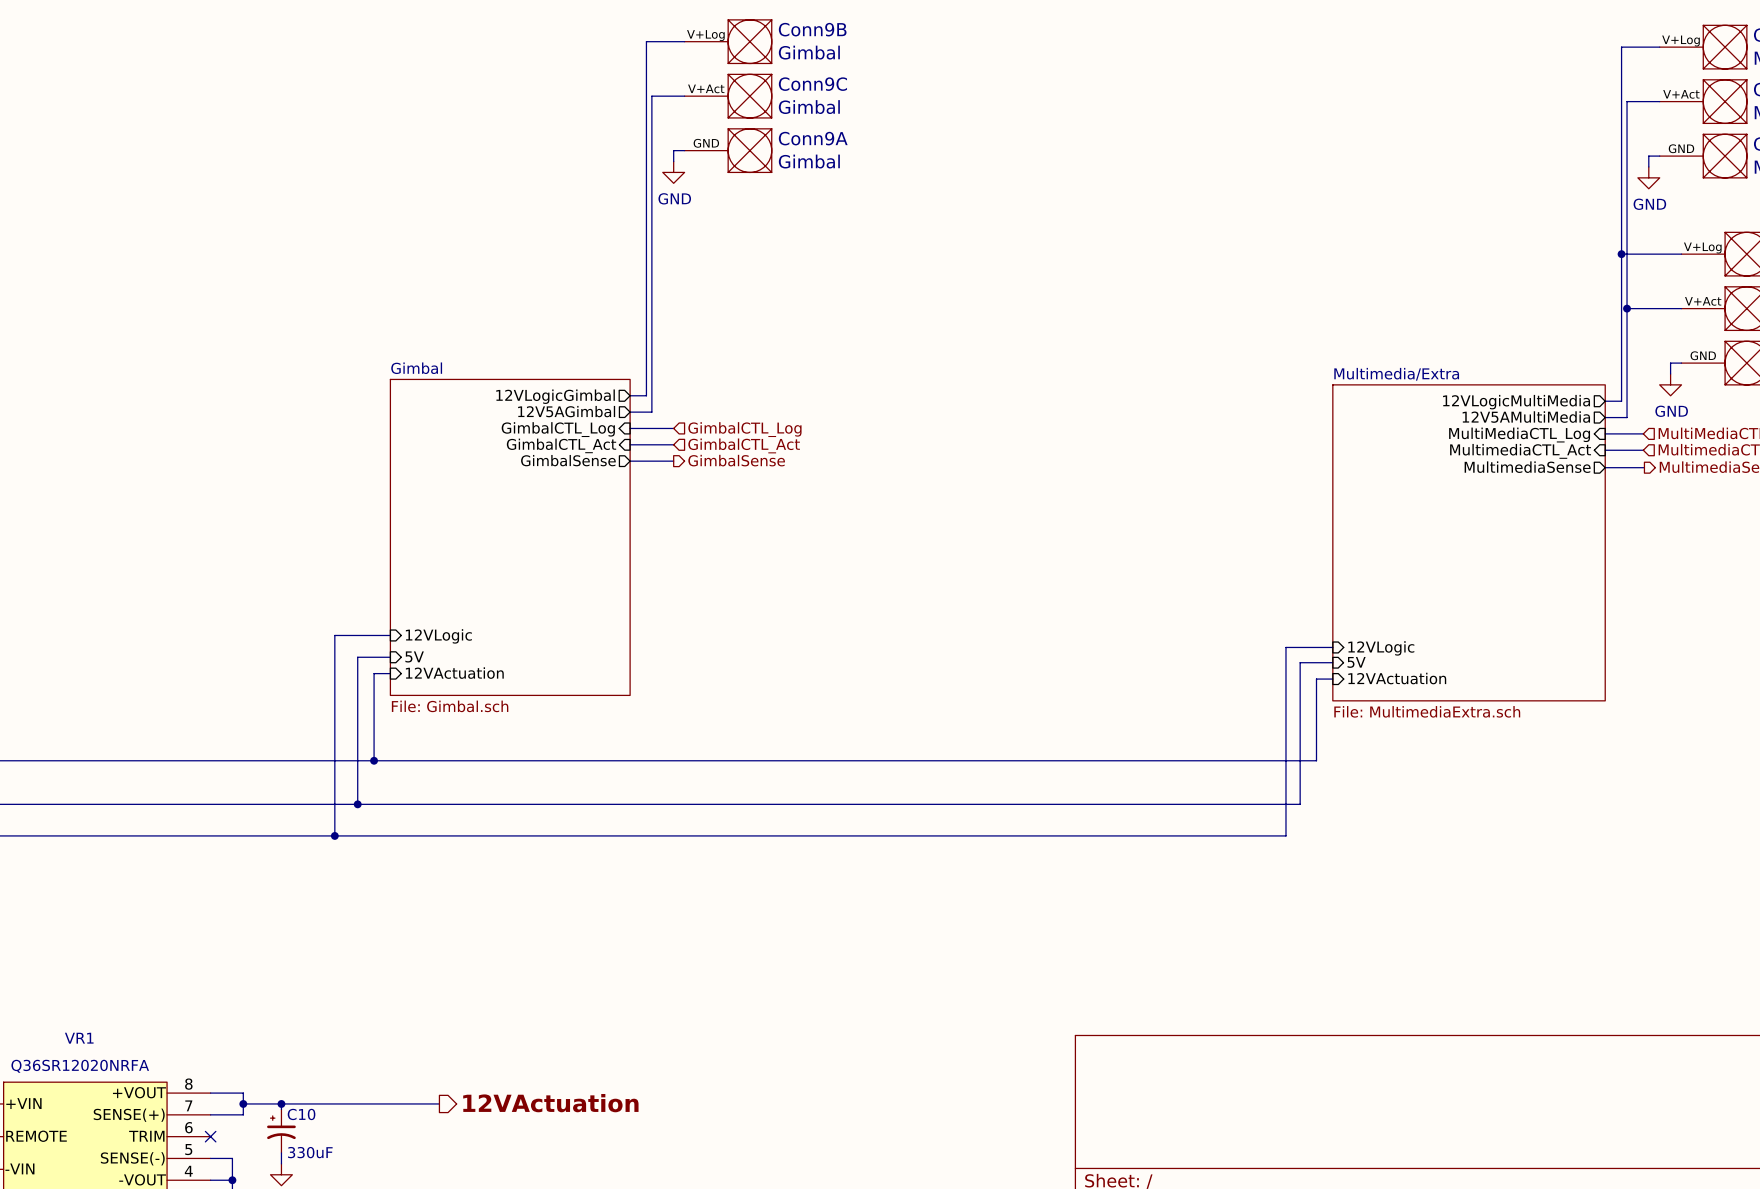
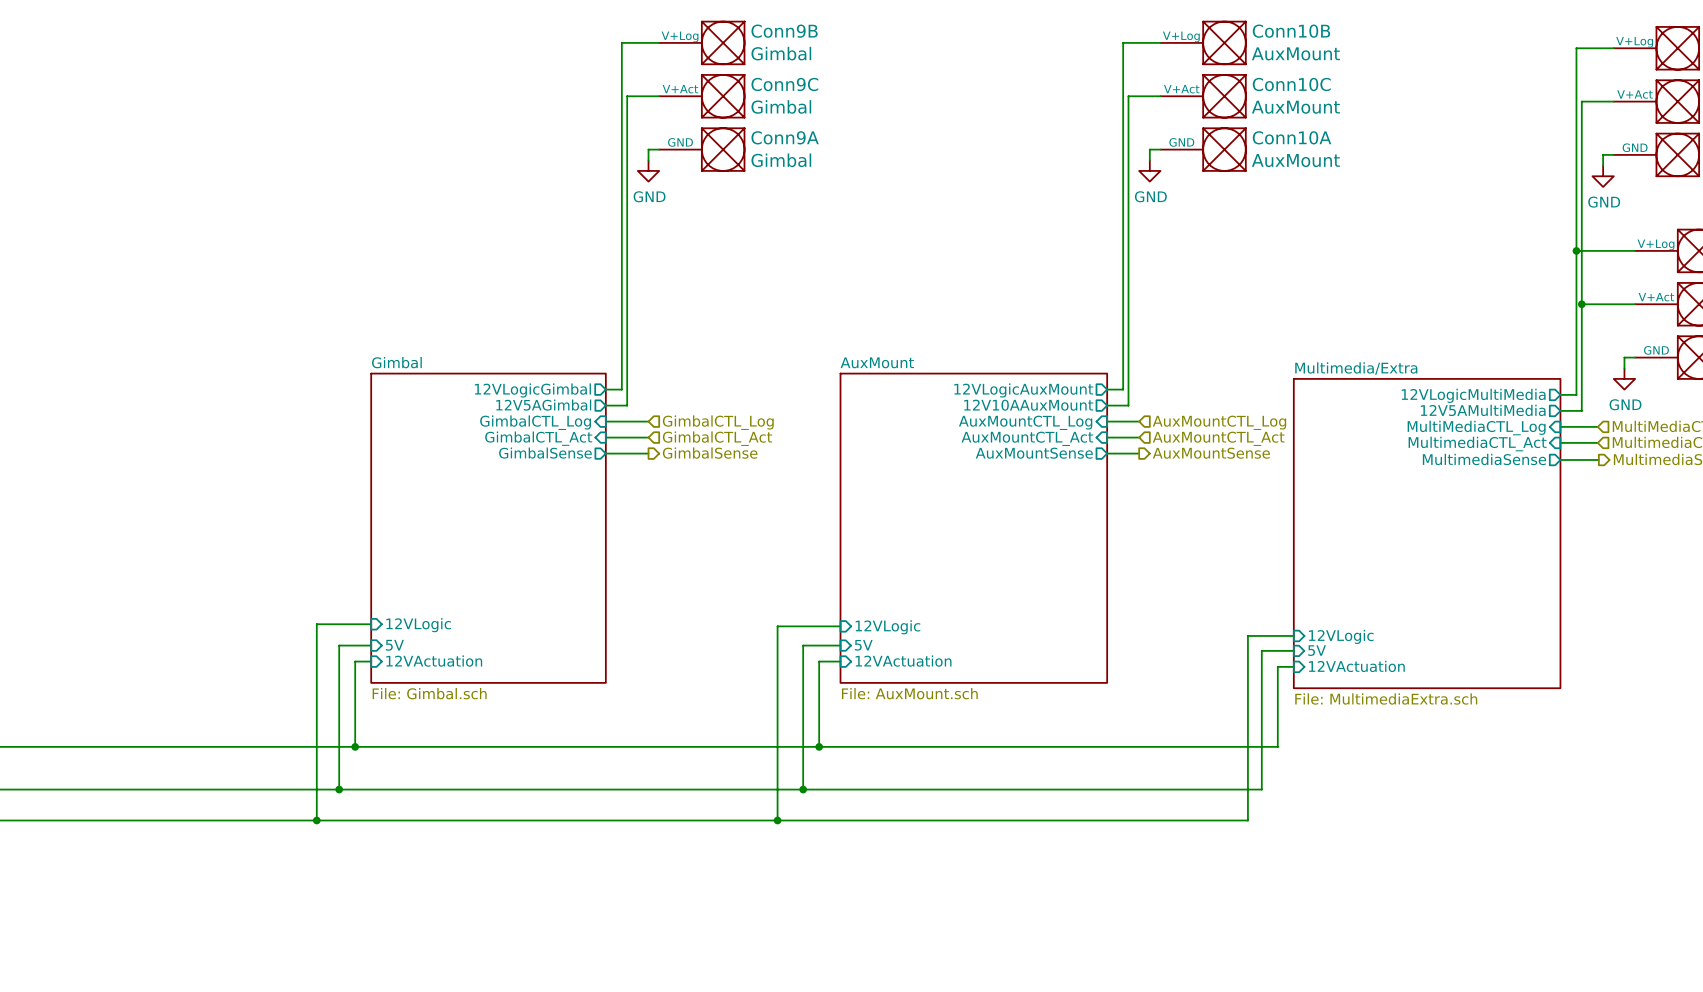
wire: none -> (1160, 42) (1123, 42) (1123, 389) (1107, 389)
Conn10B: none -> AuxMount (1203, 42)
wire: none -> (1160, 96) (1128, 96) (1128, 405) (1107, 405)
Conn10C: none -> AuxMount (1203, 96)
wire: none -> (1160, 149) (1149, 149) (1149, 160)
Conn10A: none -> AuxMount (1203, 149)
power symbol: none -> GND (1149, 170)
sheet pin: none -> 12VLogicAuxMount (1023, 390)
sheet pin: none -> 12V10AAuxMount (1028, 405)
wire: none -> (1107, 421) (1139, 421)
sheet pin: none -> AuxMountCTL_Log (1025, 422)
hierarchical label: none -> AuxMountCTL_Log (1219, 422)
wire: none -> (1107, 437) (1139, 437)
sheet pin: none -> AuxMountCTL_Act (1027, 438)
hierarchical label: none -> AuxMountCTL_Act (1218, 438)
sheet pin: none -> AuxMountSense (1034, 453)
hierarchical label: none -> AuxMountSense (1211, 453)
wire: none -> (1107, 453) (1139, 453)
sheet AuxMount: none -> File: AuxMount.sch (973, 528)
wire: none -> (840, 626) (777, 626) (777, 820)
sheet pin: none -> 12VLogic (887, 627)
sheet pin: none -> 5V (863, 645)
wire: none -> (840, 645) (803, 645) (803, 789)
wire: none -> (840, 661) (819, 661) (819, 746)
sheet pin: none -> 12VActuation (903, 661)
junction: none -> (819, 746)
junction: none -> (803, 789)
junction: none -> (777, 820)

